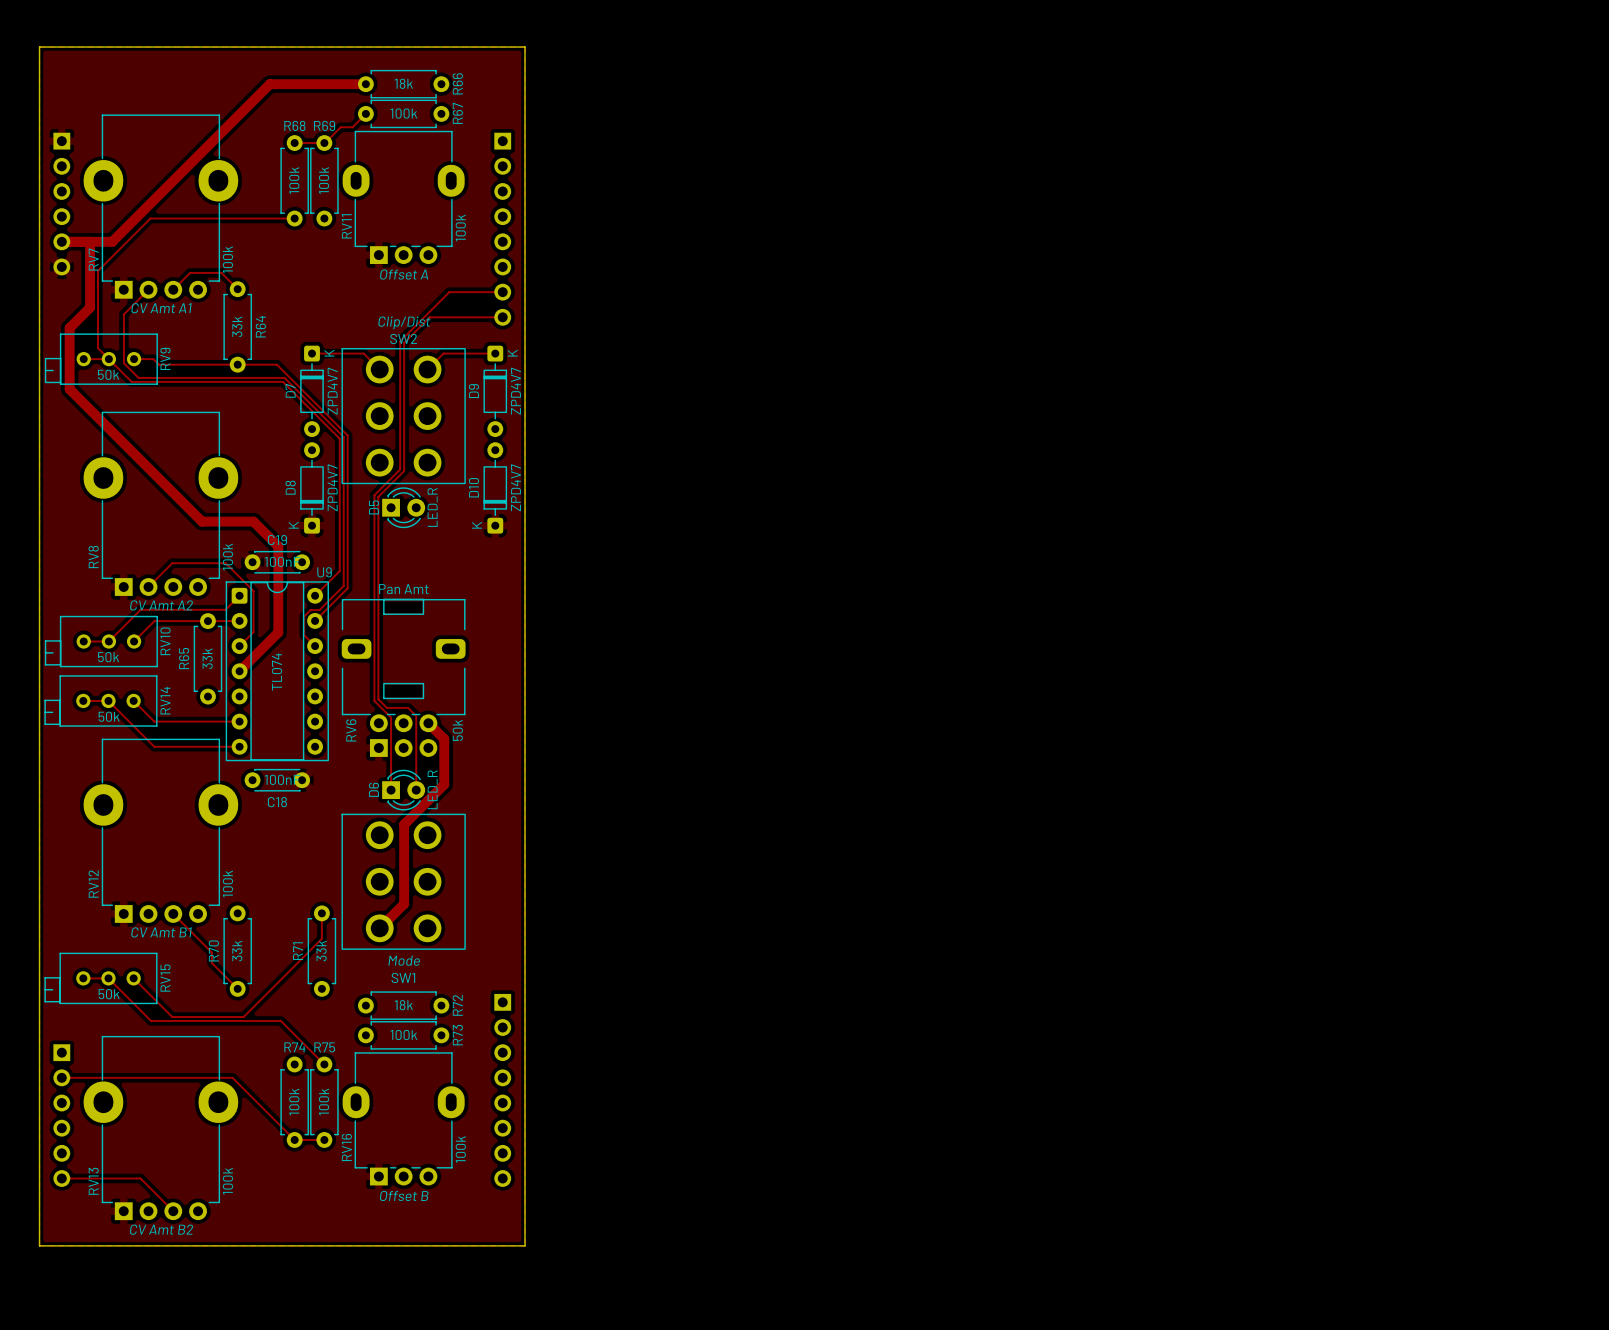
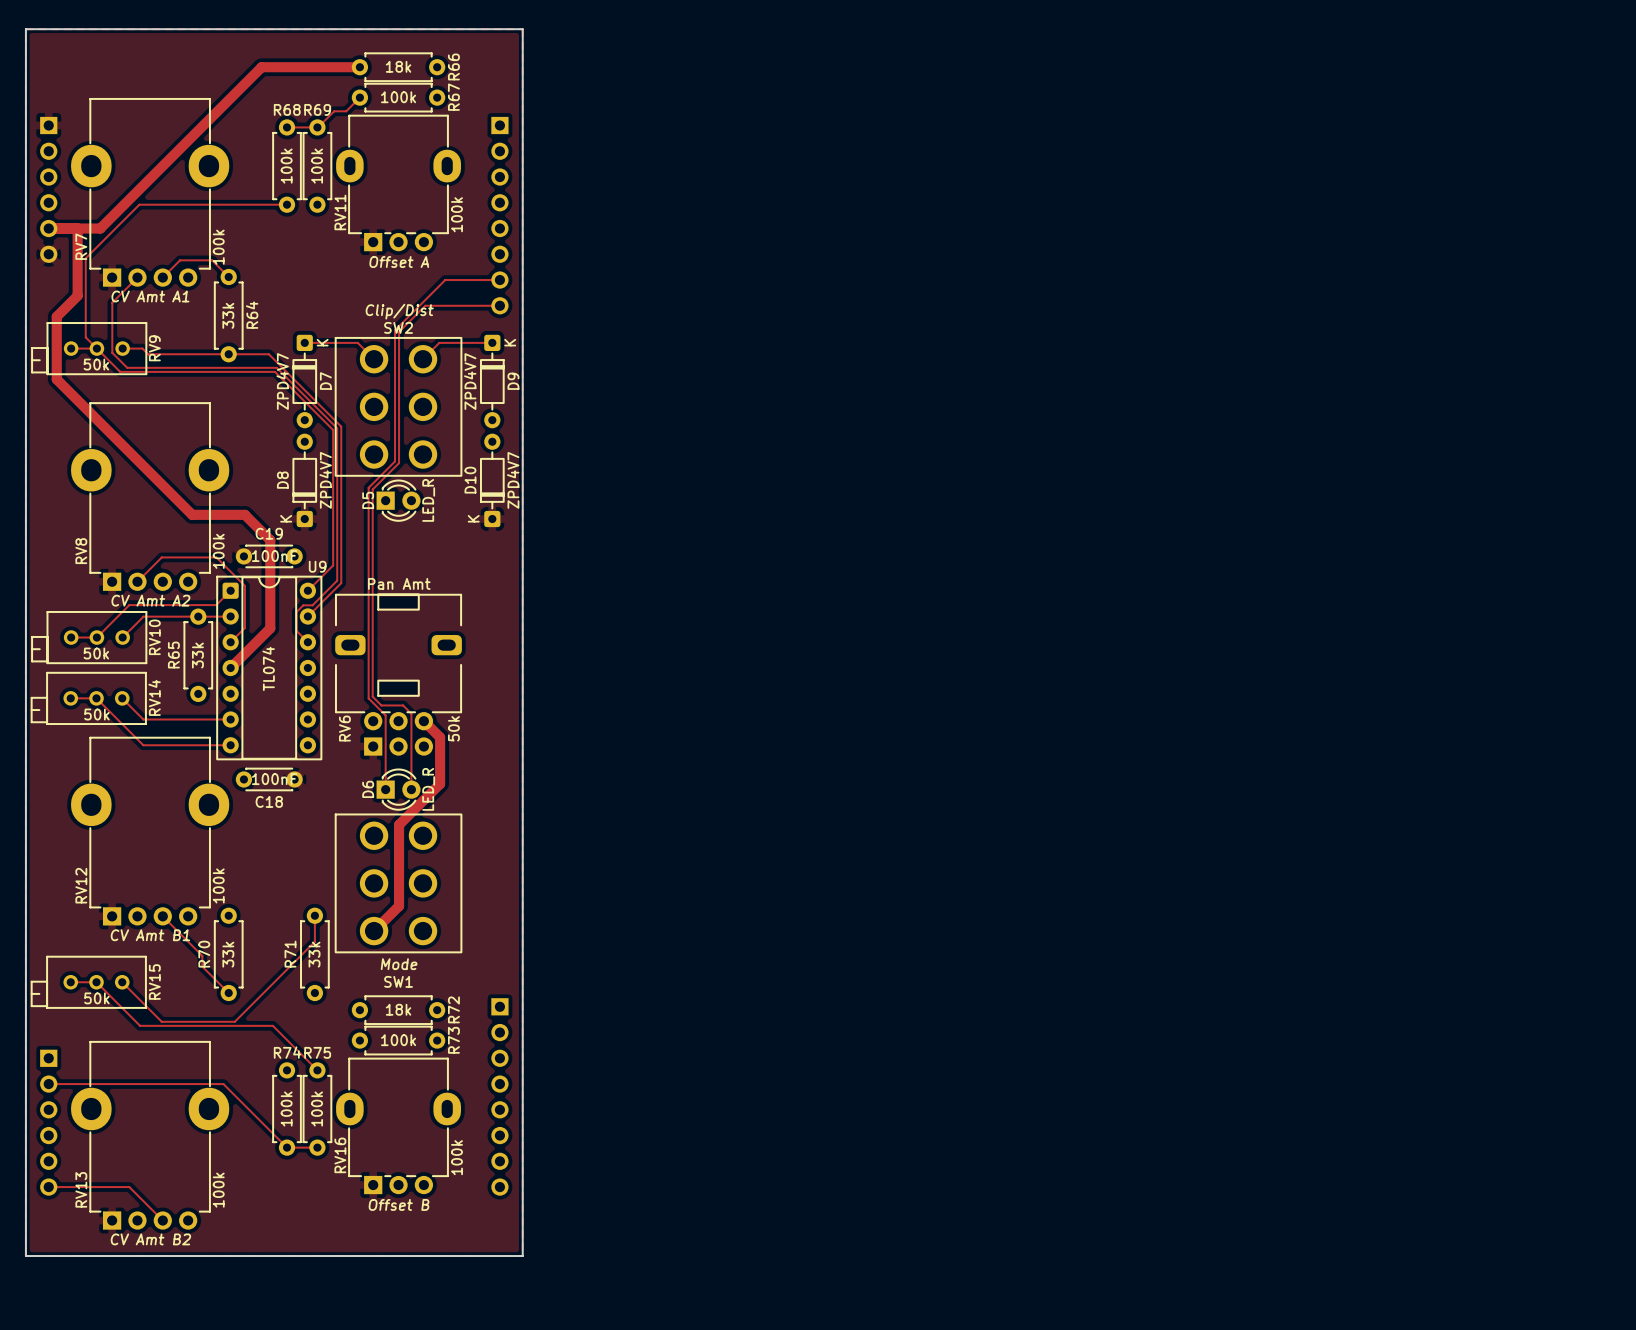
D7 name position: D7 (290, 390) -> D7 (325, 381)
D7 value position: ZPD4V7 (332, 391) -> ZPD4V7 (282, 381)
D9 name position: D9 (473, 391) -> D9 (513, 381)
D9 value position: ZPD4V7 (515, 391) -> ZPD4V7 (470, 381)

